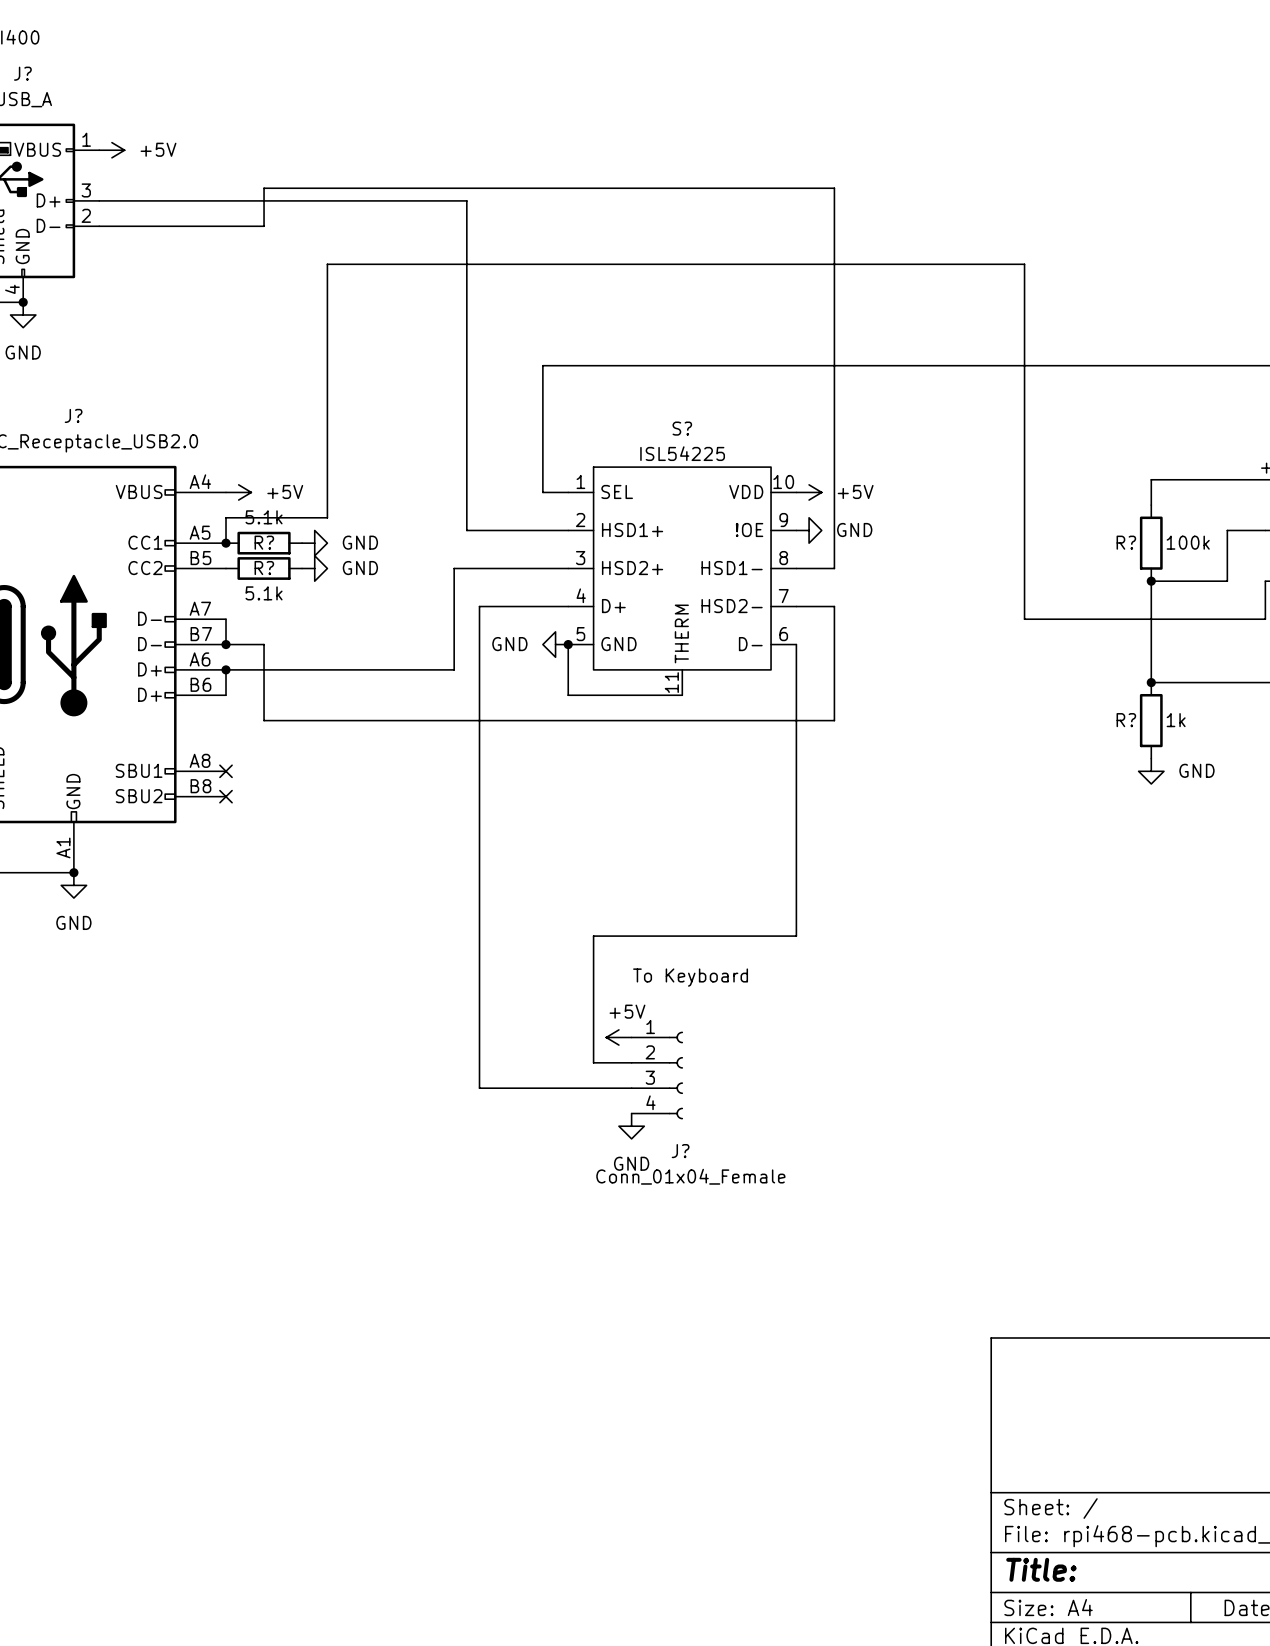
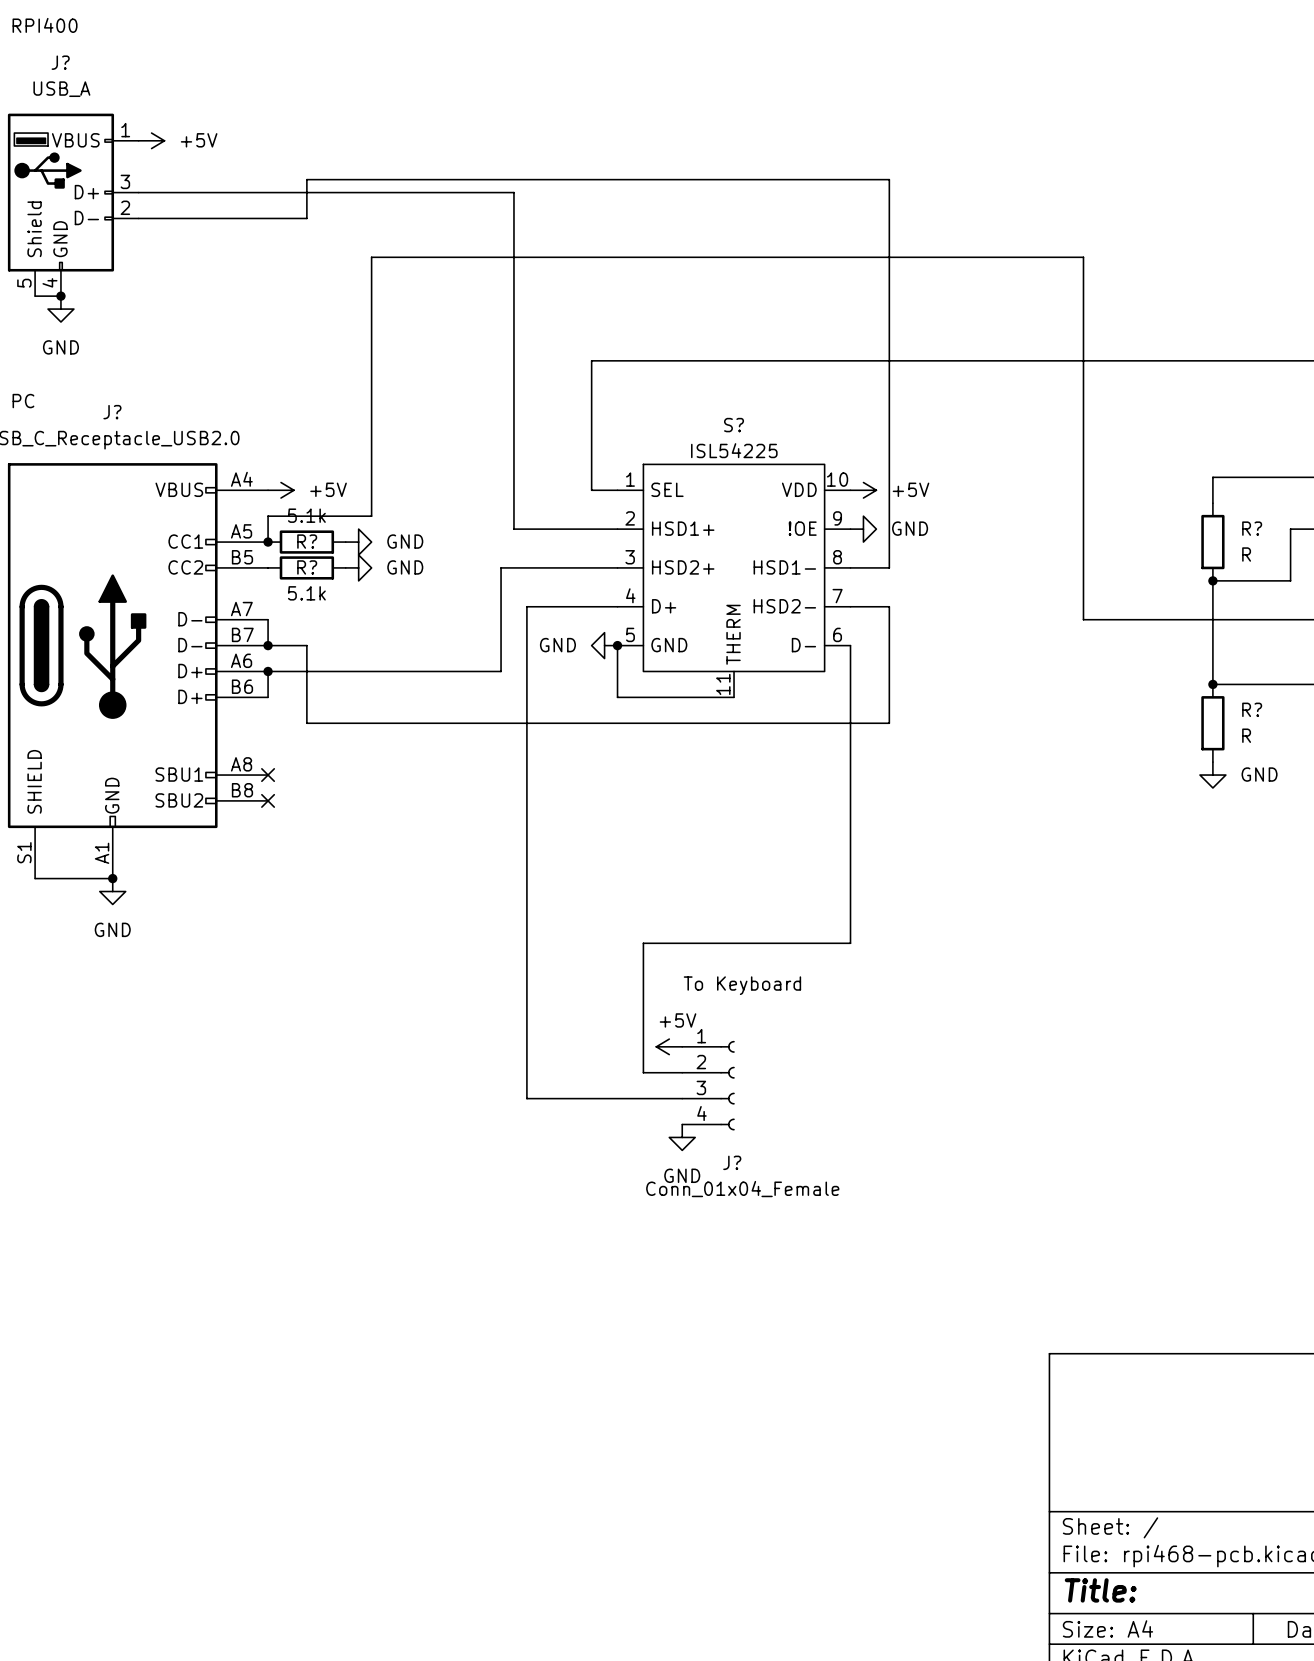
R? name position: R? (1126, 542) -> R? (1252, 528)
R? value: 100k (1188, 542) -> R (1246, 554)
R? name position: R? (1126, 720) -> R? (1252, 709)
R? value: 1k (1176, 720) -> R (1246, 735)

